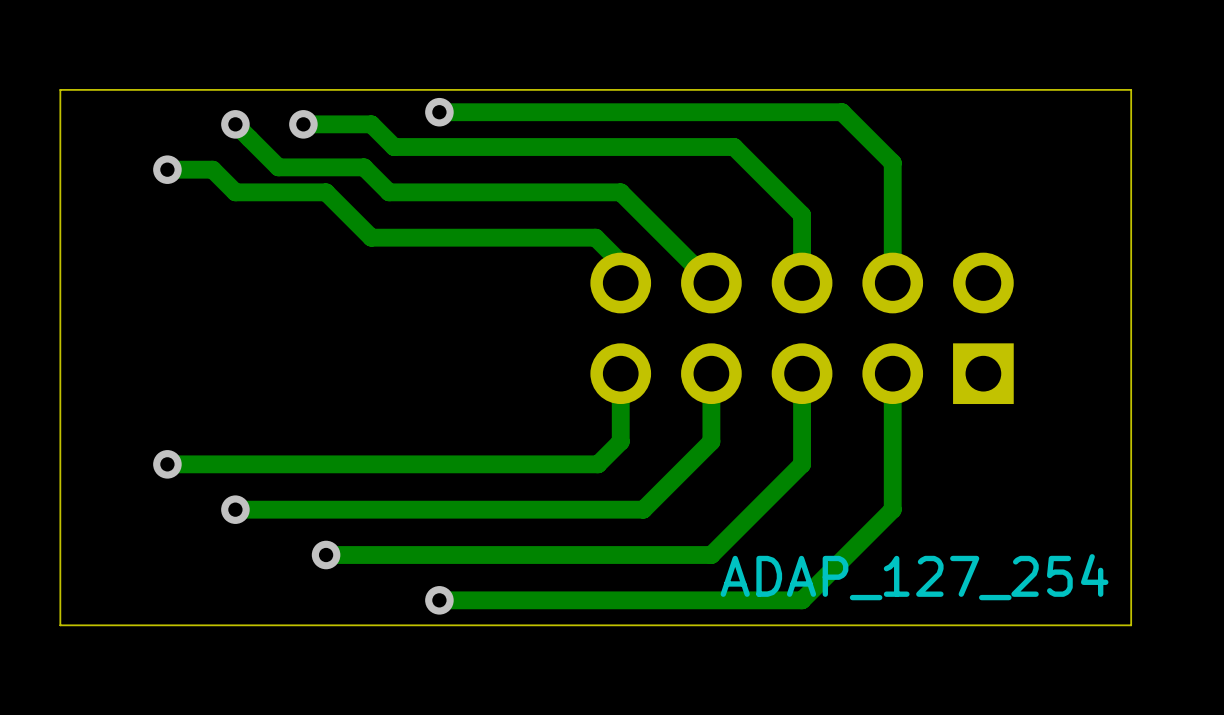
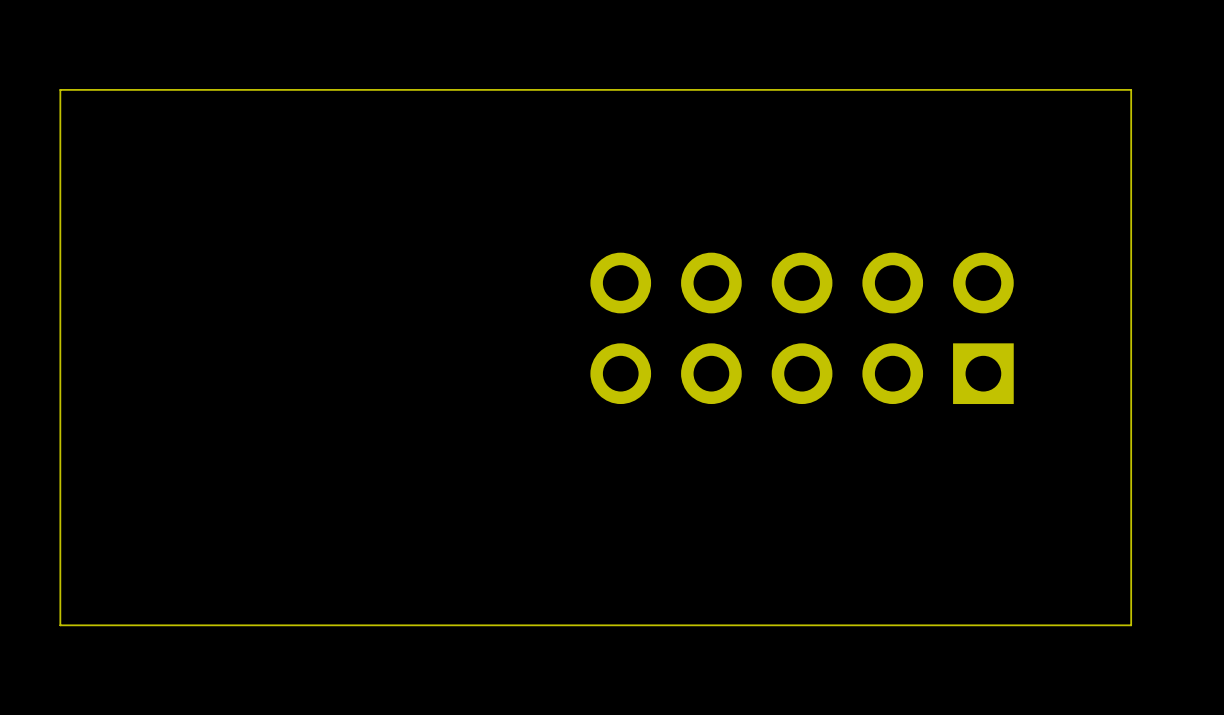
track: (439, 112) (842, 112) (892, 162) (892, 283) -> none
via: (439, 112) -> none
track: (235, 124) (278, 167) (364, 167) (389, 192) (620, 192) (711, 283) -> none
via: (235, 124) -> none
track: (303, 124) (371, 124) (394, 147) (734, 147) (802, 215) (802, 283) -> none
via: (303, 124) -> none
track: (167, 169) (212, 169) (235, 192) (326, 192) (371, 237) (595, 237) (620, 262) (620, 283) -> none
via: (167, 169) -> none
track: (620, 373) (620, 441) (598, 464) (167, 464) -> none
track: (711, 373) (711, 441) (643, 509) (235, 509) -> none
track: (802, 373) (802, 464) (711, 555) (326, 555) -> none
track: (892, 373) (892, 509) (802, 600) (439, 600) -> none
via: (167, 464) -> none
via: (235, 509) -> none
via: (326, 555) -> none
text: ADAP_127_254 (914, 577) -> none
via: (439, 600) -> none

